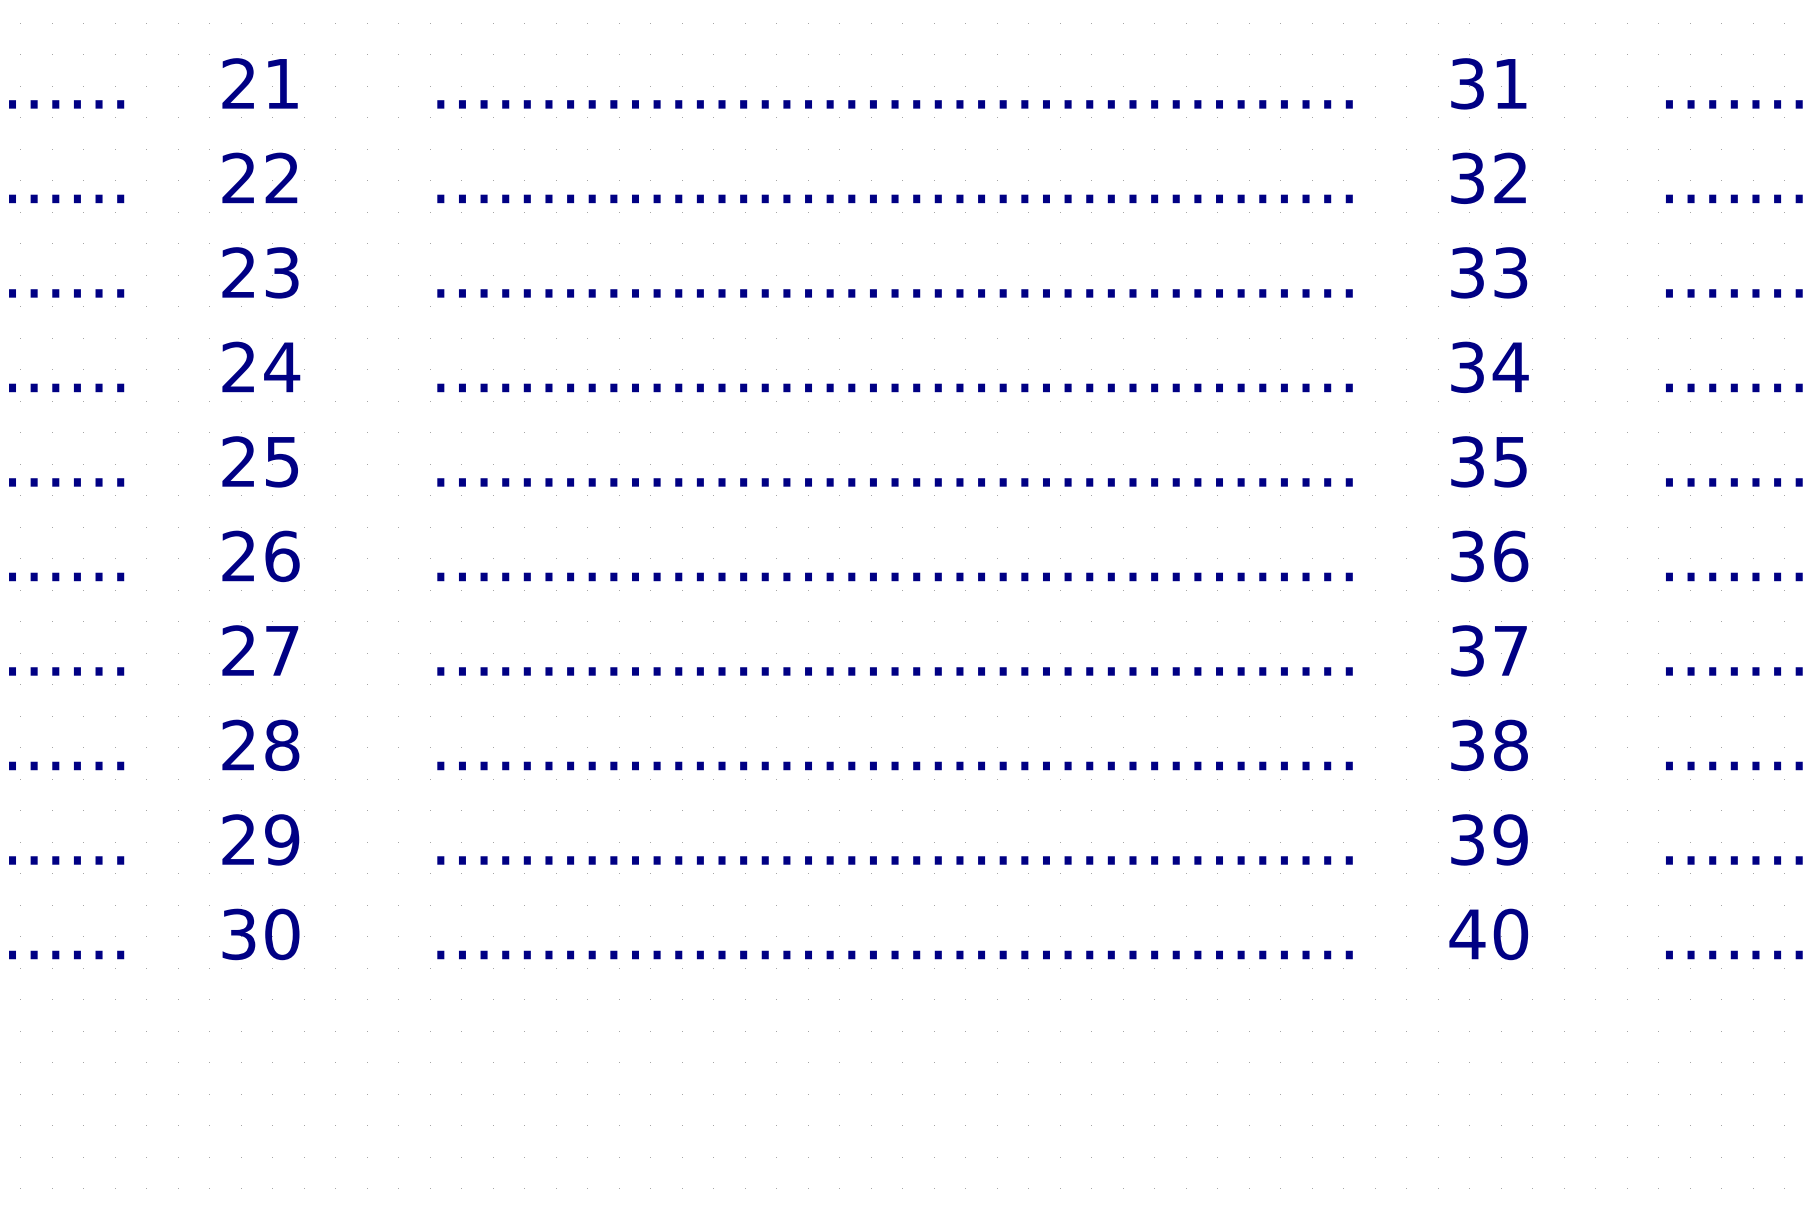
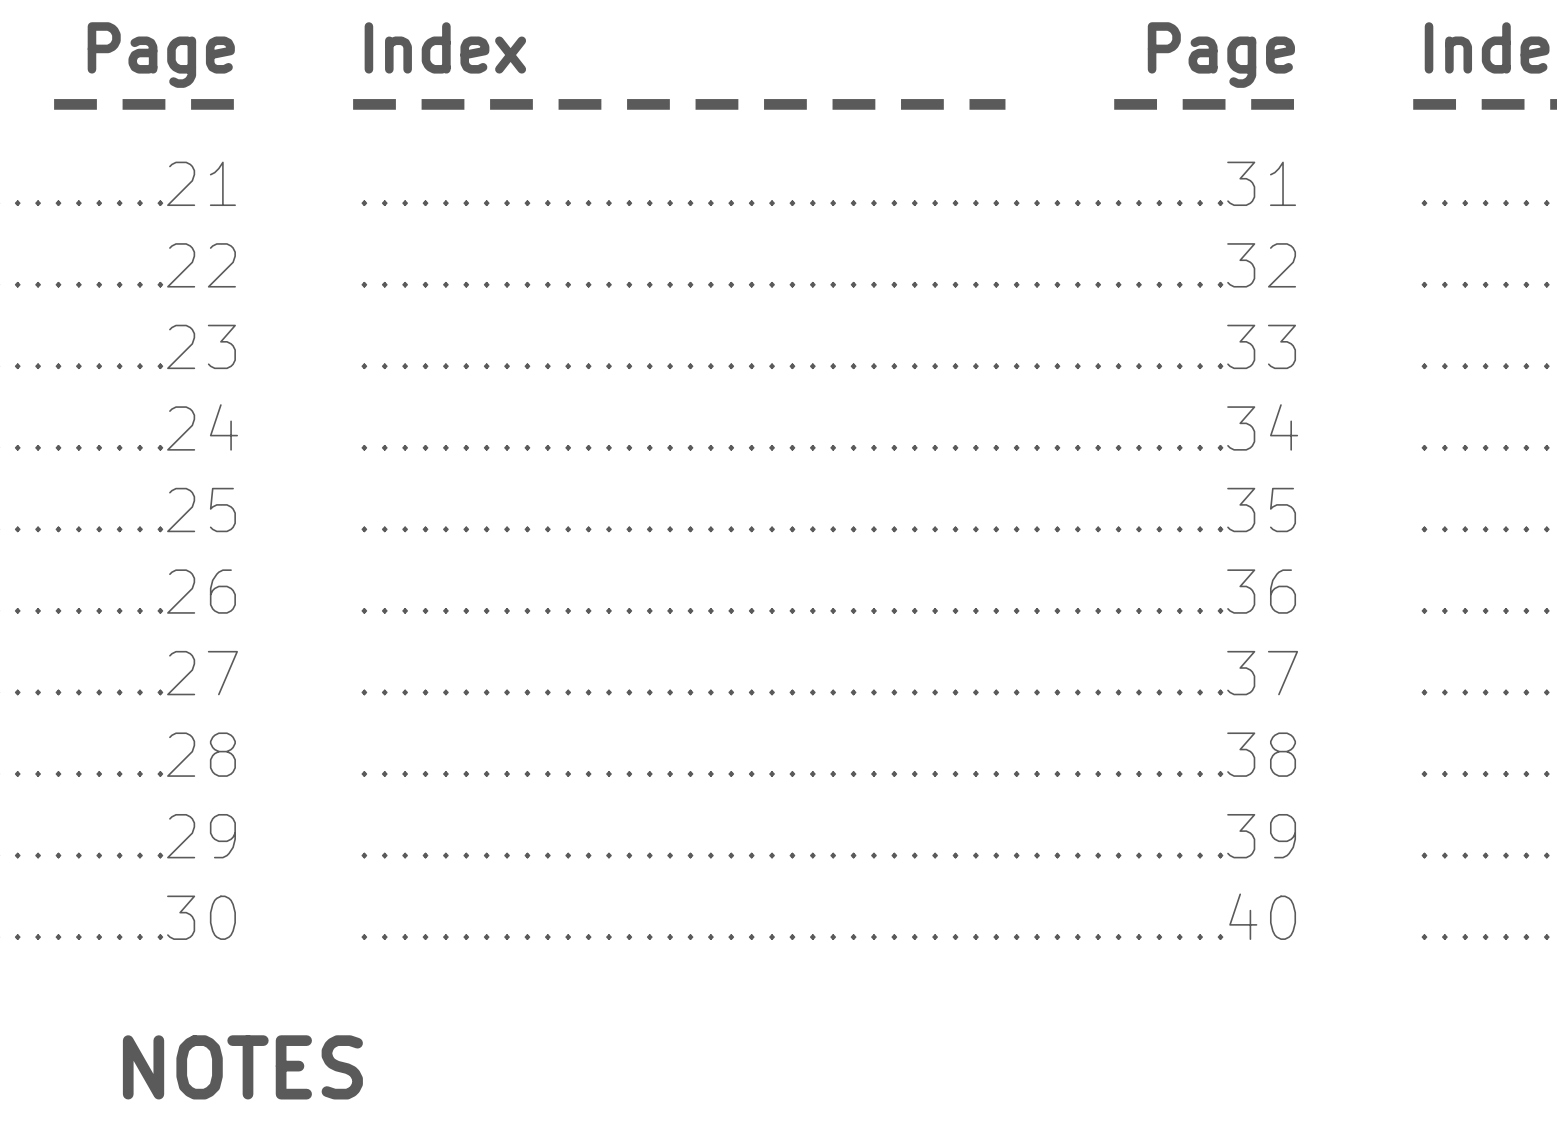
text: none -> NOTES (242, 1067)

